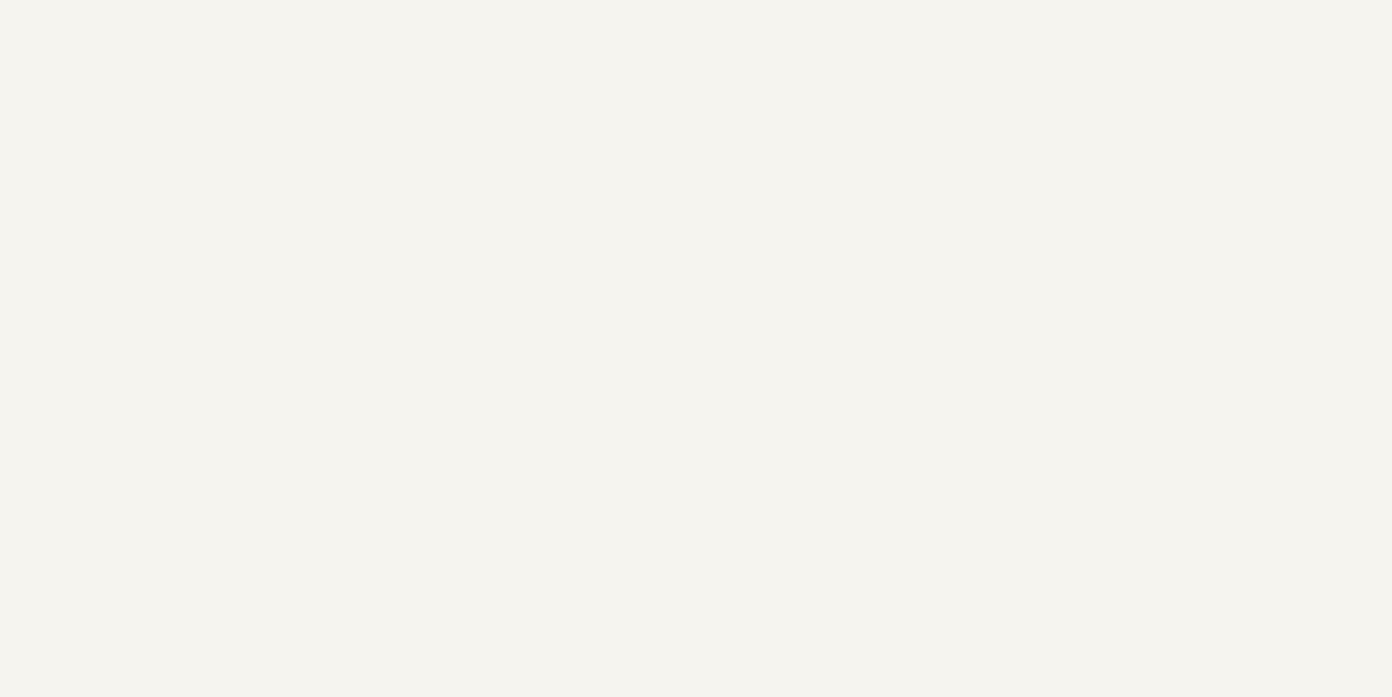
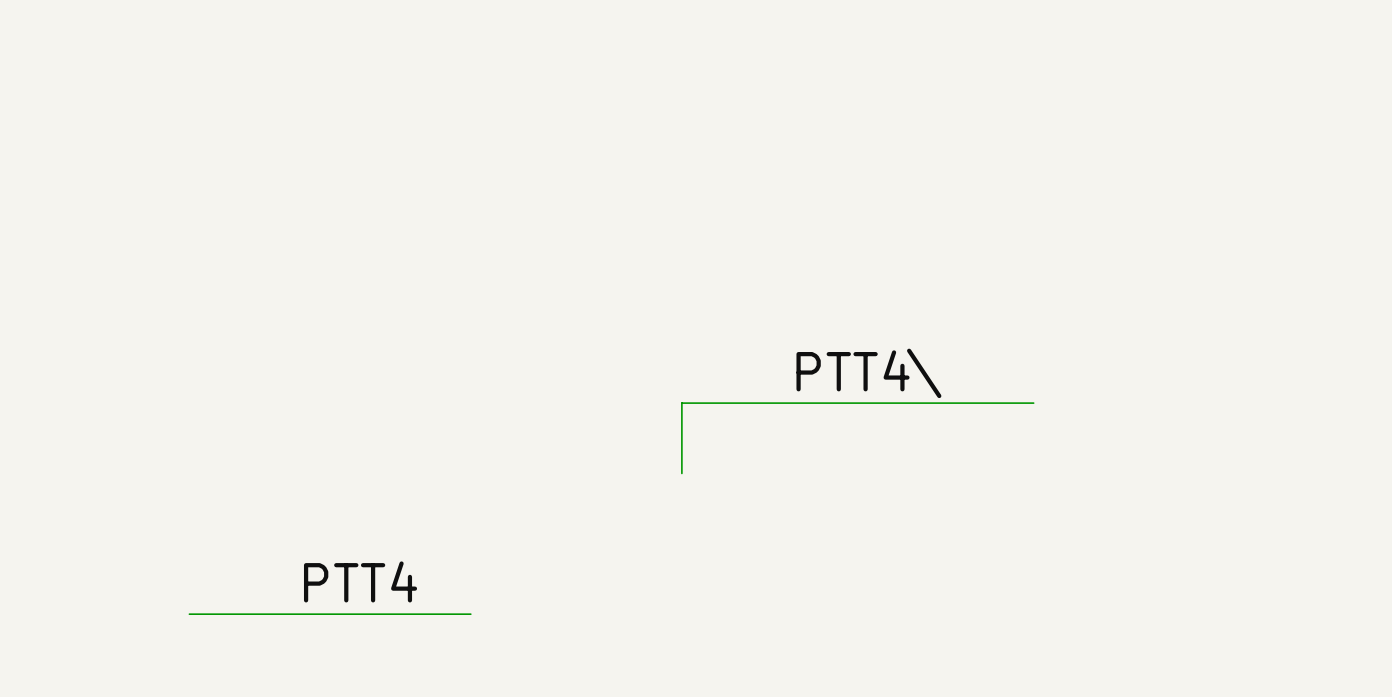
label: none -> PTT4\ (868, 373)
wire: none -> (1033, 403) (681, 403) (681, 473)
label: none -> PTT4 (360, 581)
wire: none -> (189, 614) (470, 614)

